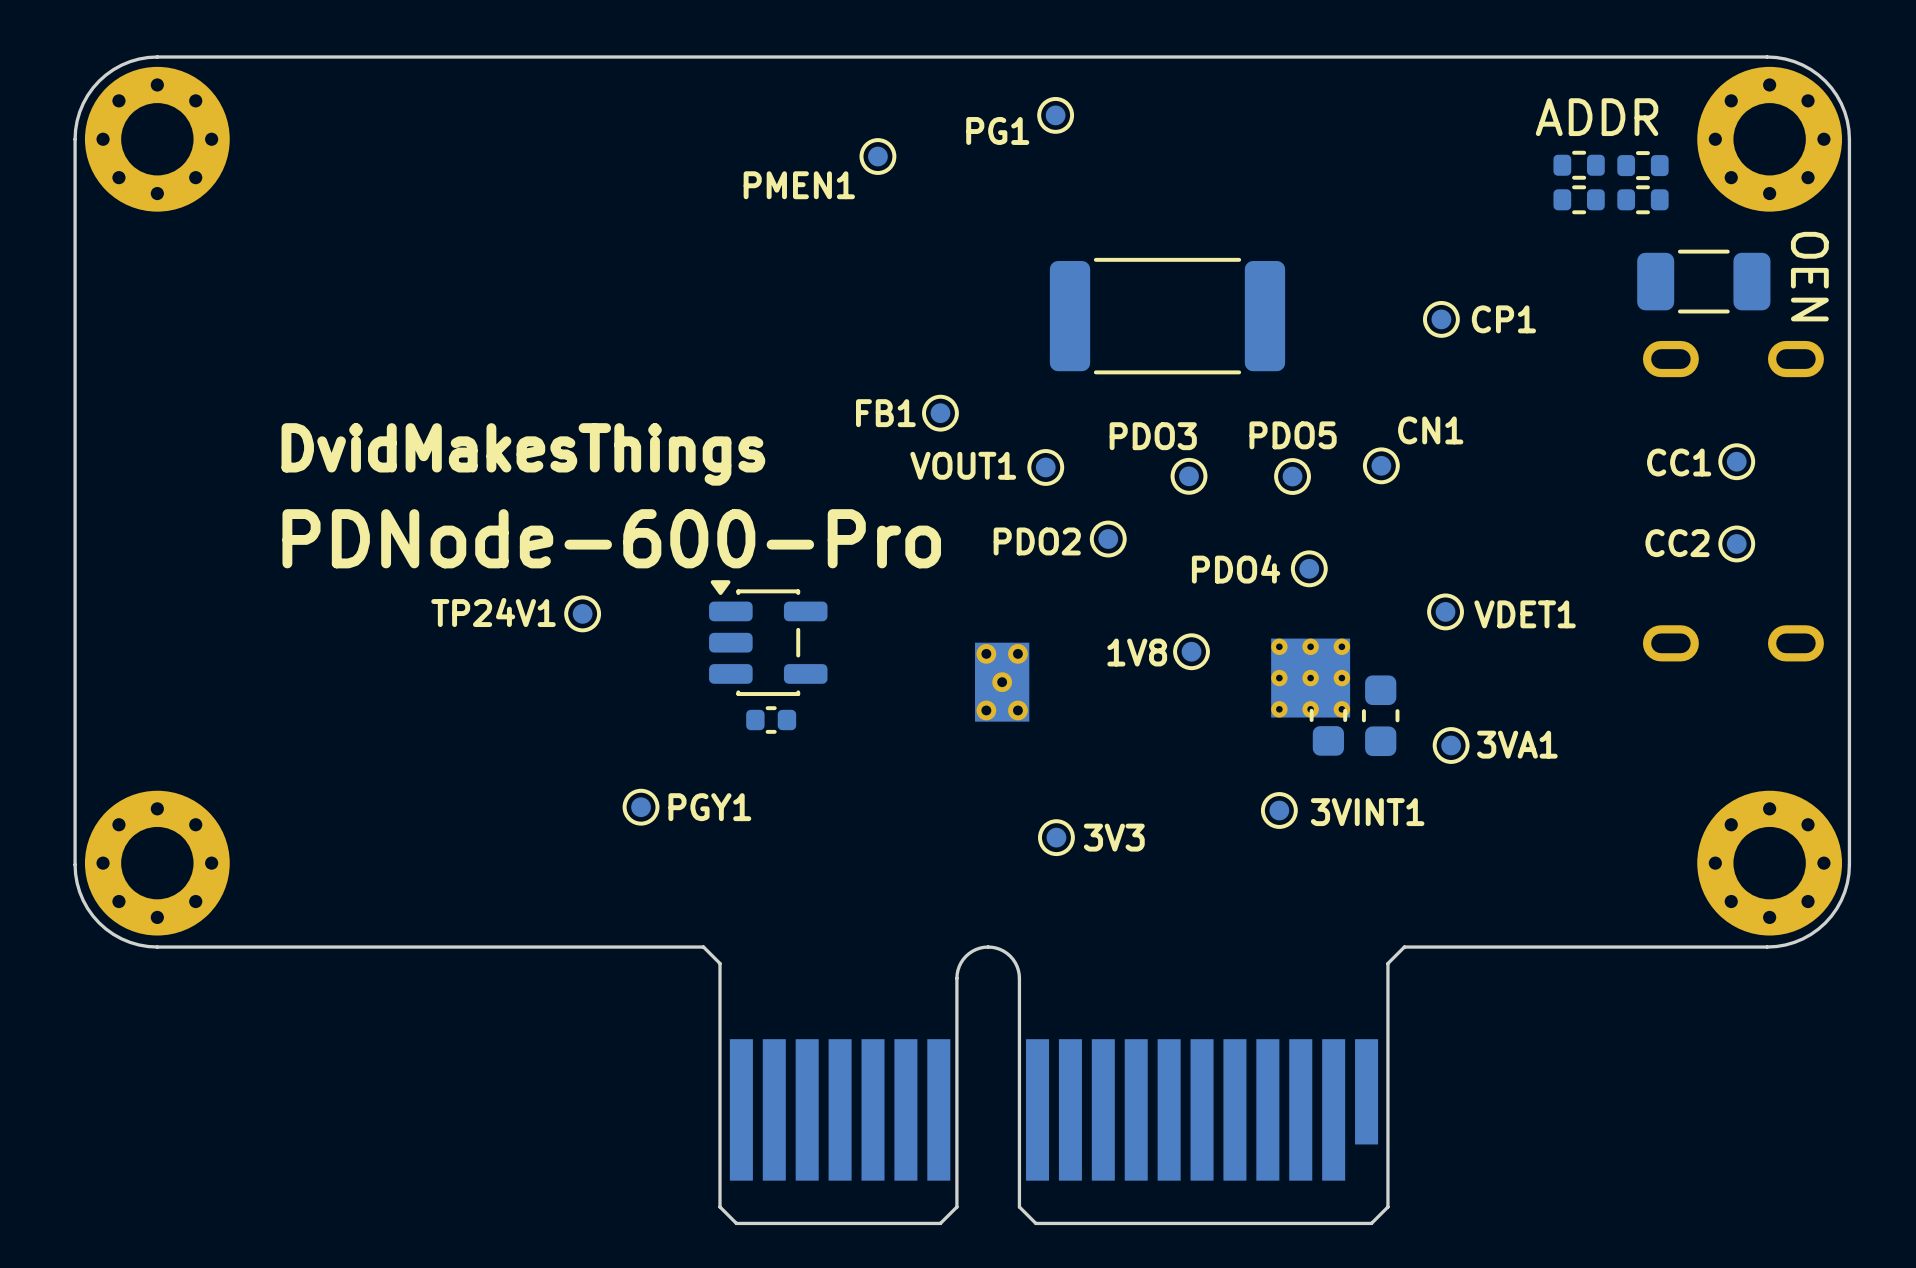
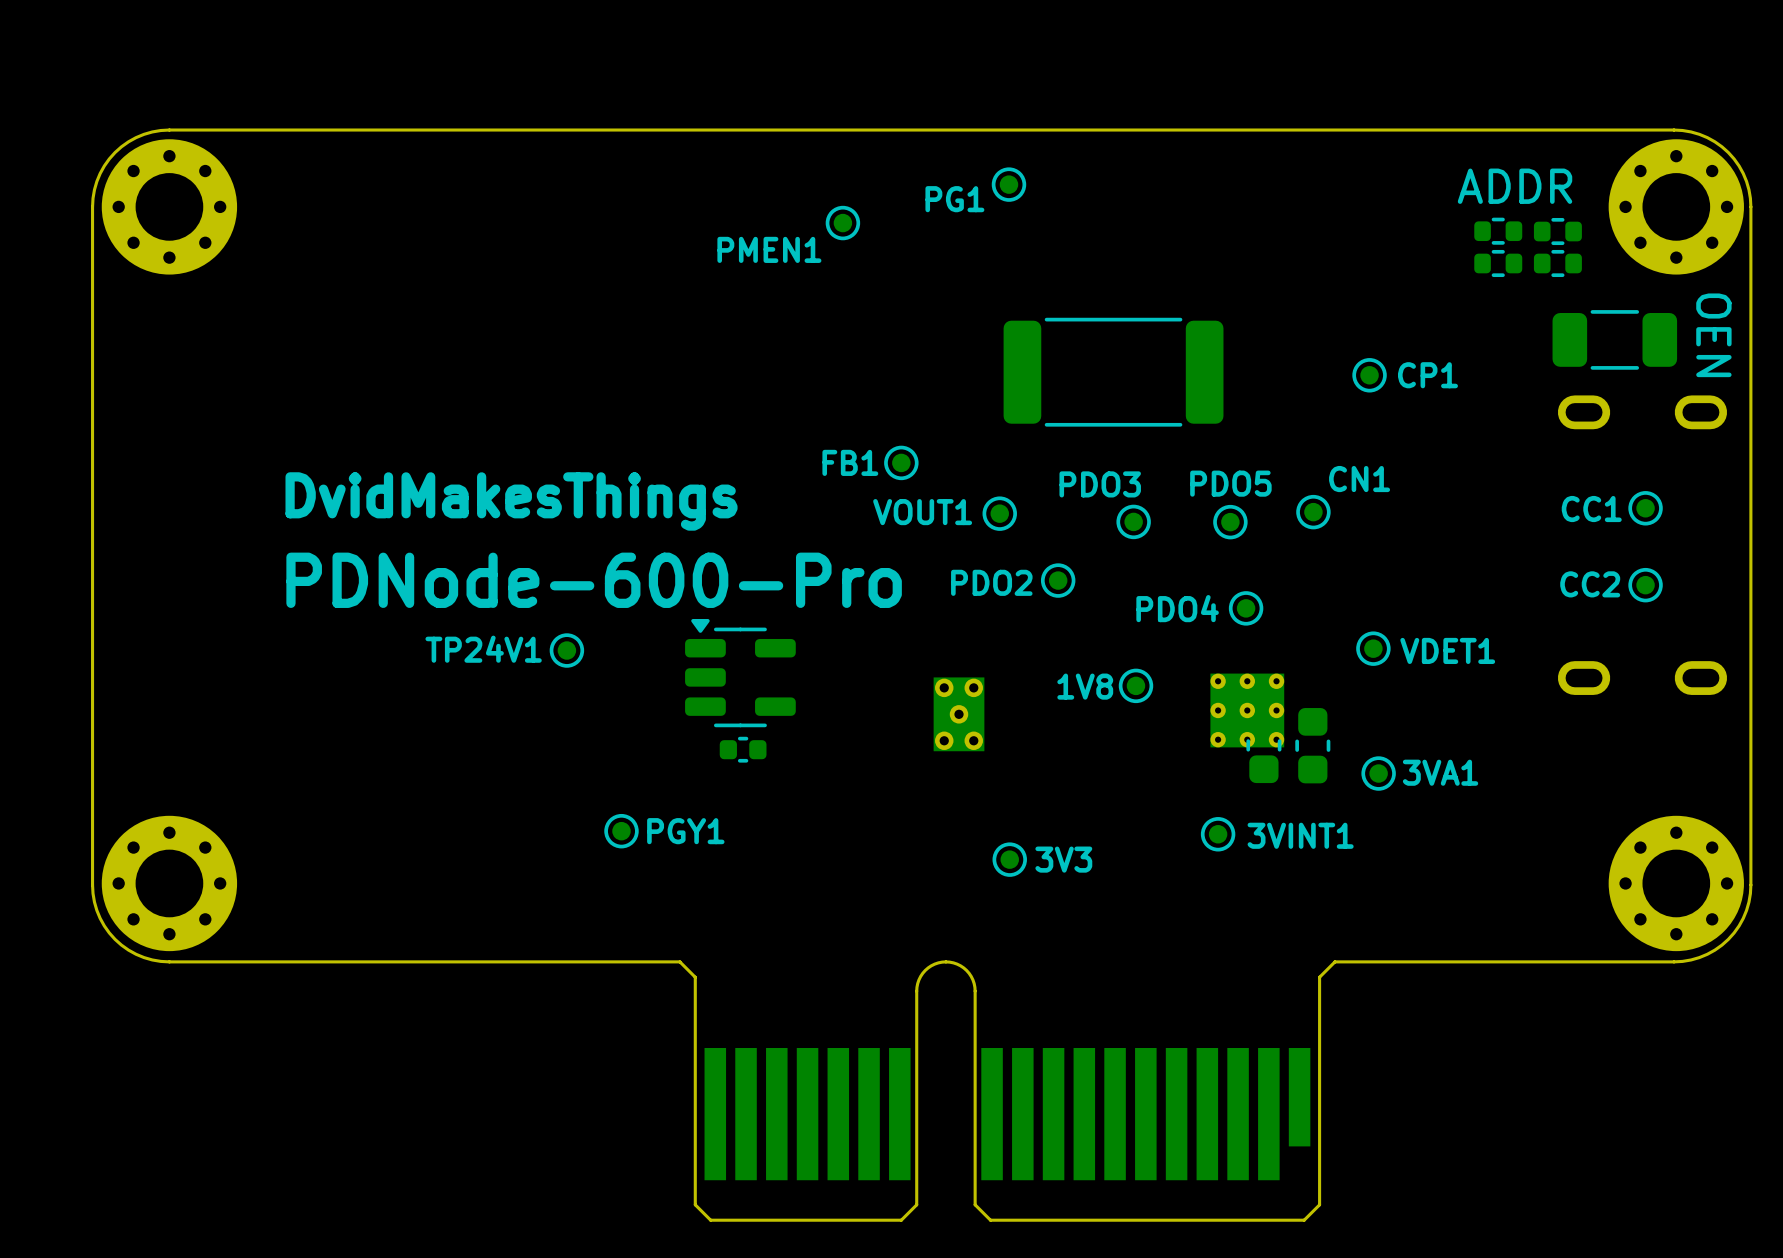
part footprint: [709, 580, 828, 696] -> [685, 618, 796, 728]

